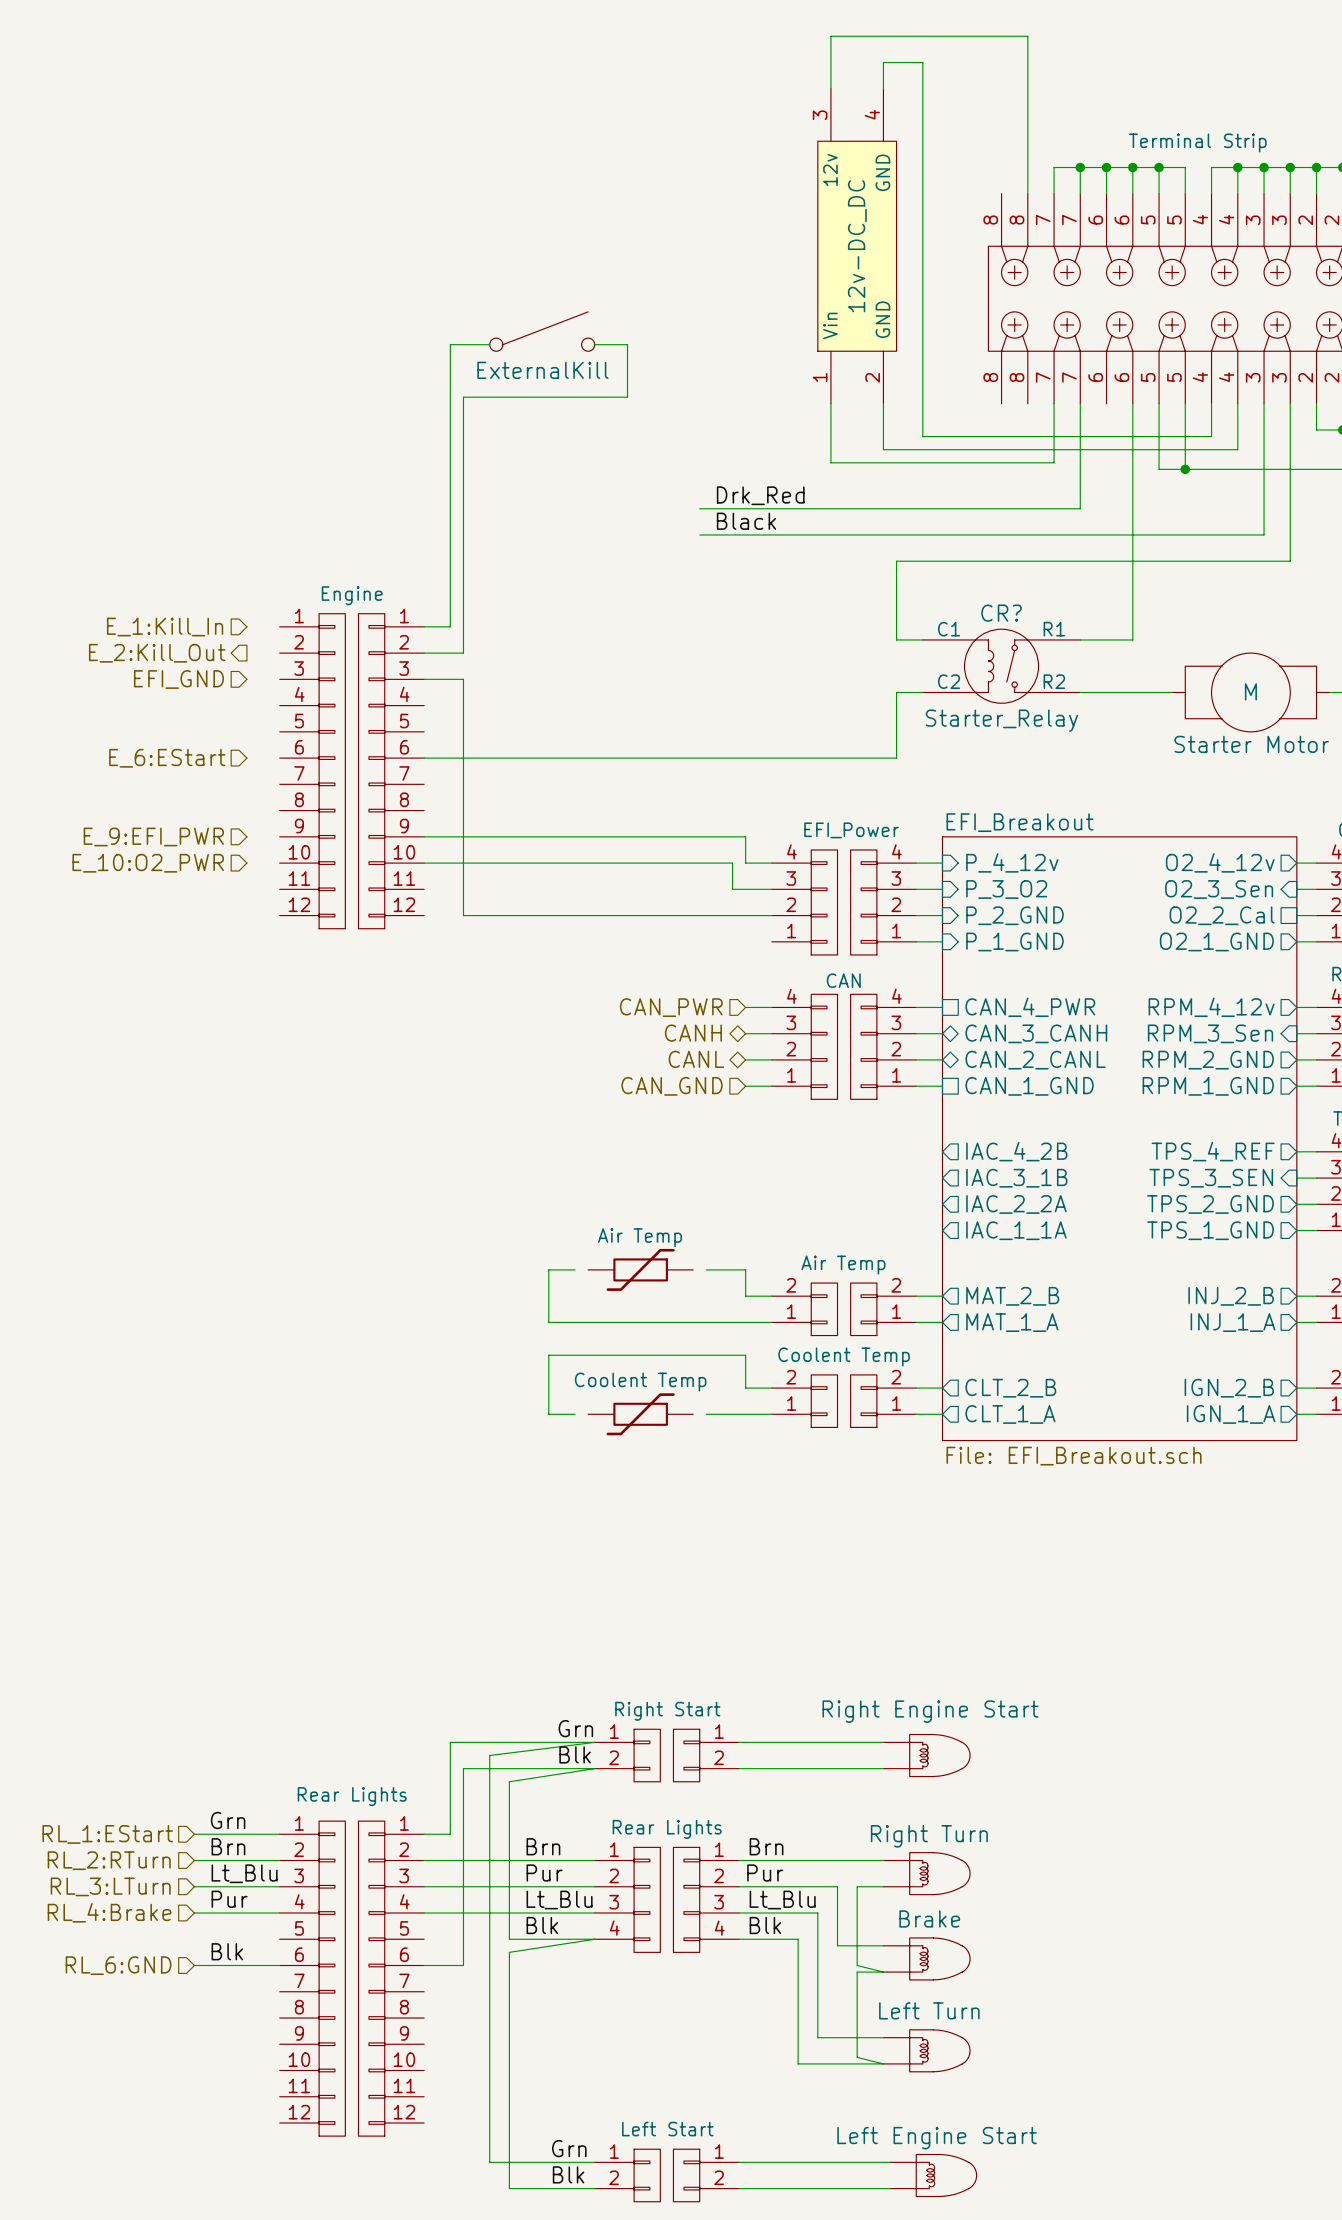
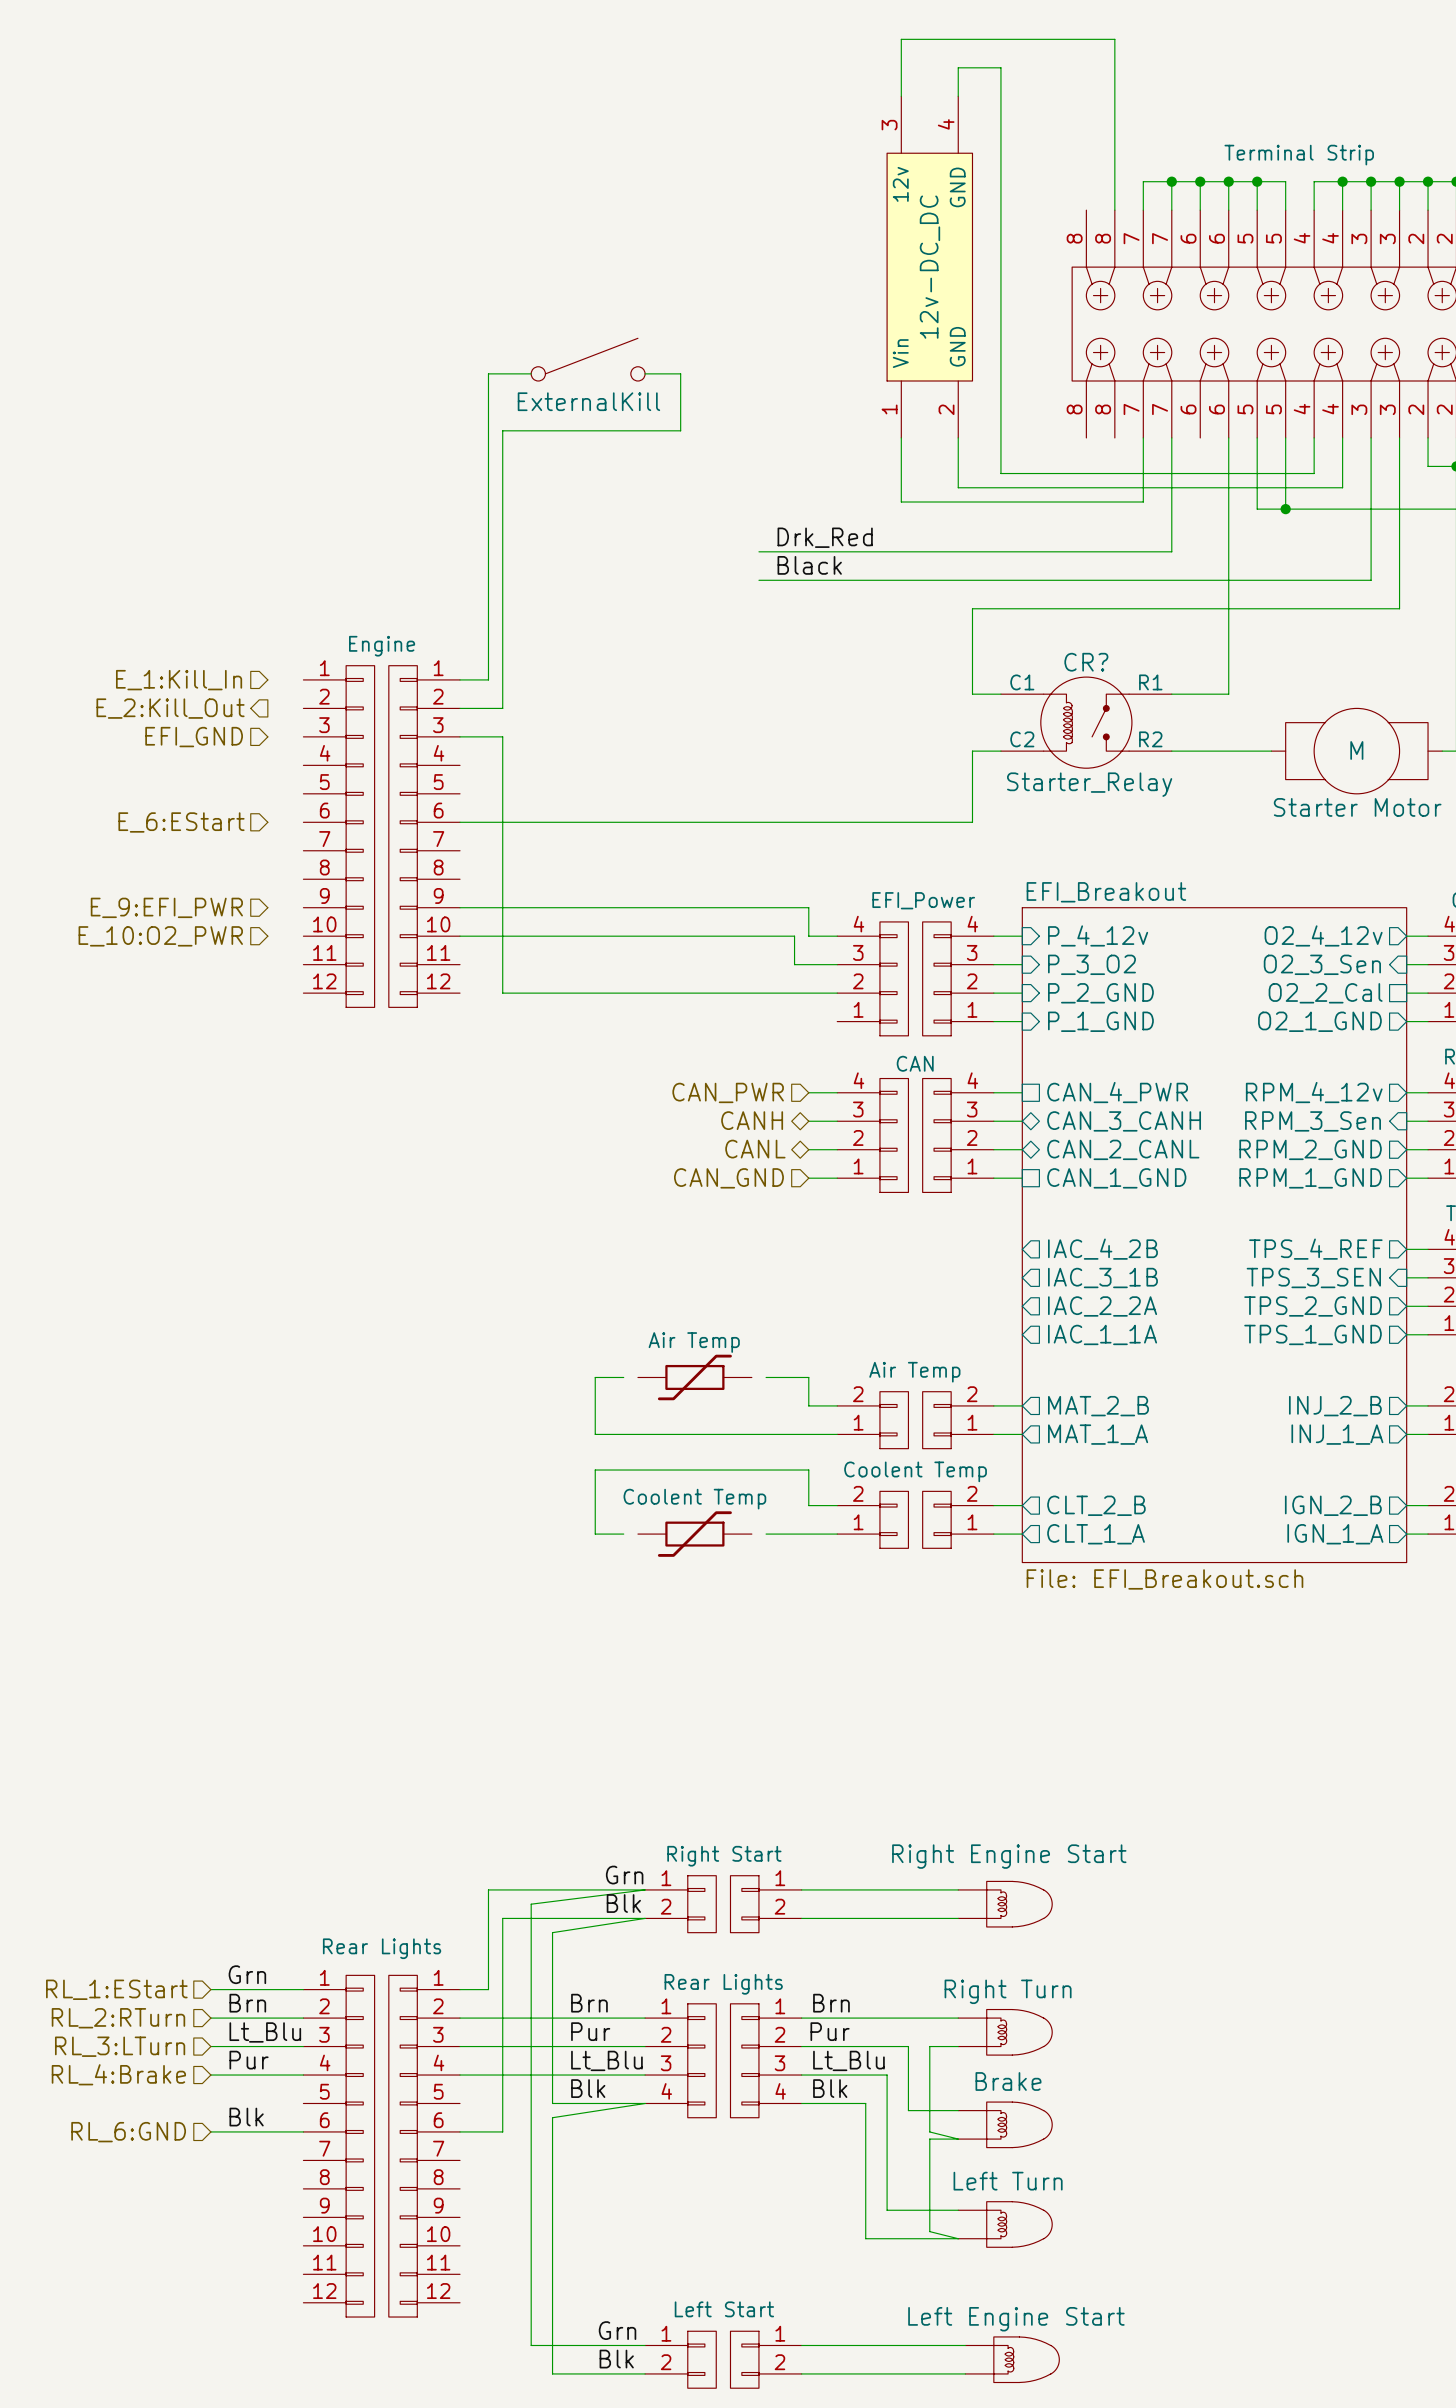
CR? symbol: [922, 629, 1081, 704] -> [1000, 677, 1172, 769]

